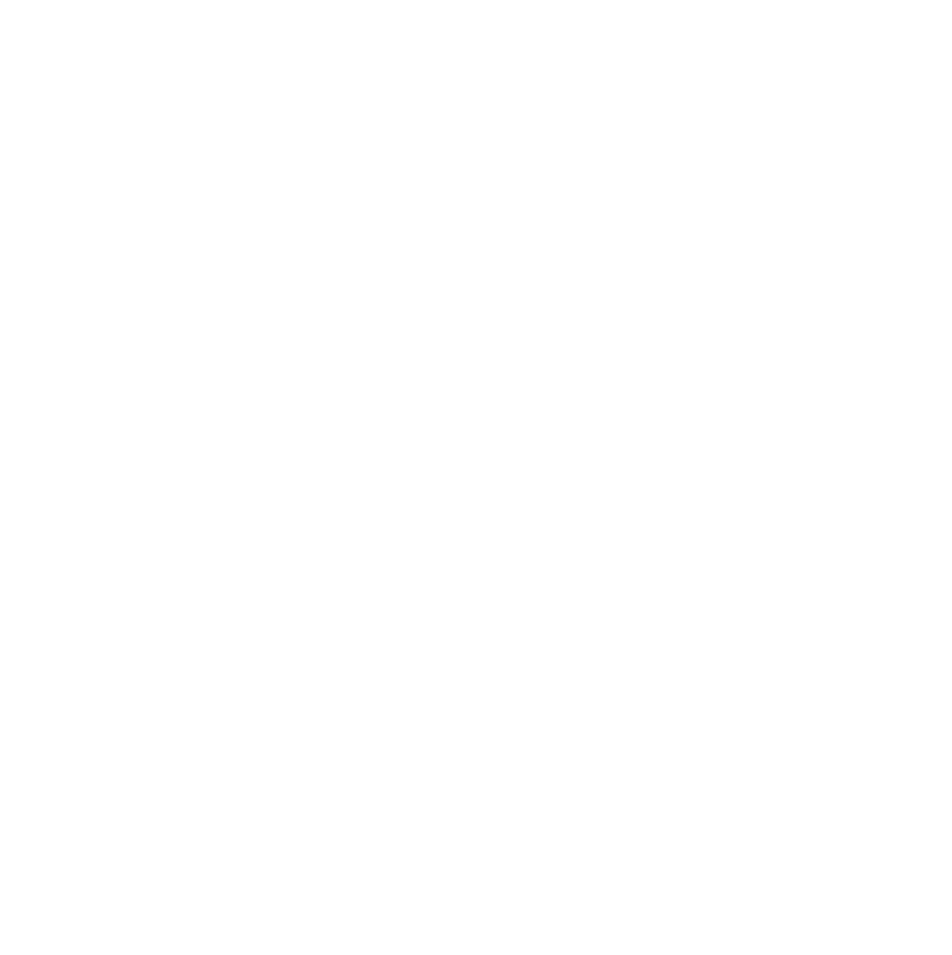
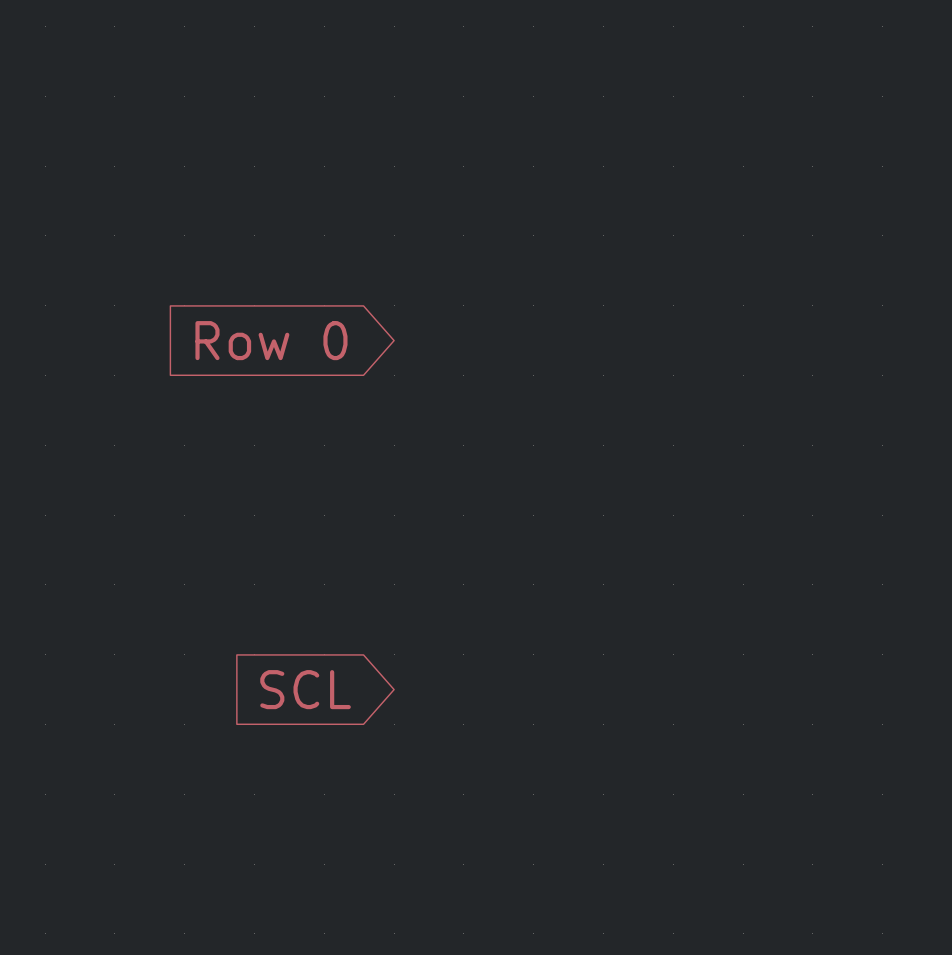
global label: none -> Row 0 (271, 340)
global label: none -> SCL (305, 689)

